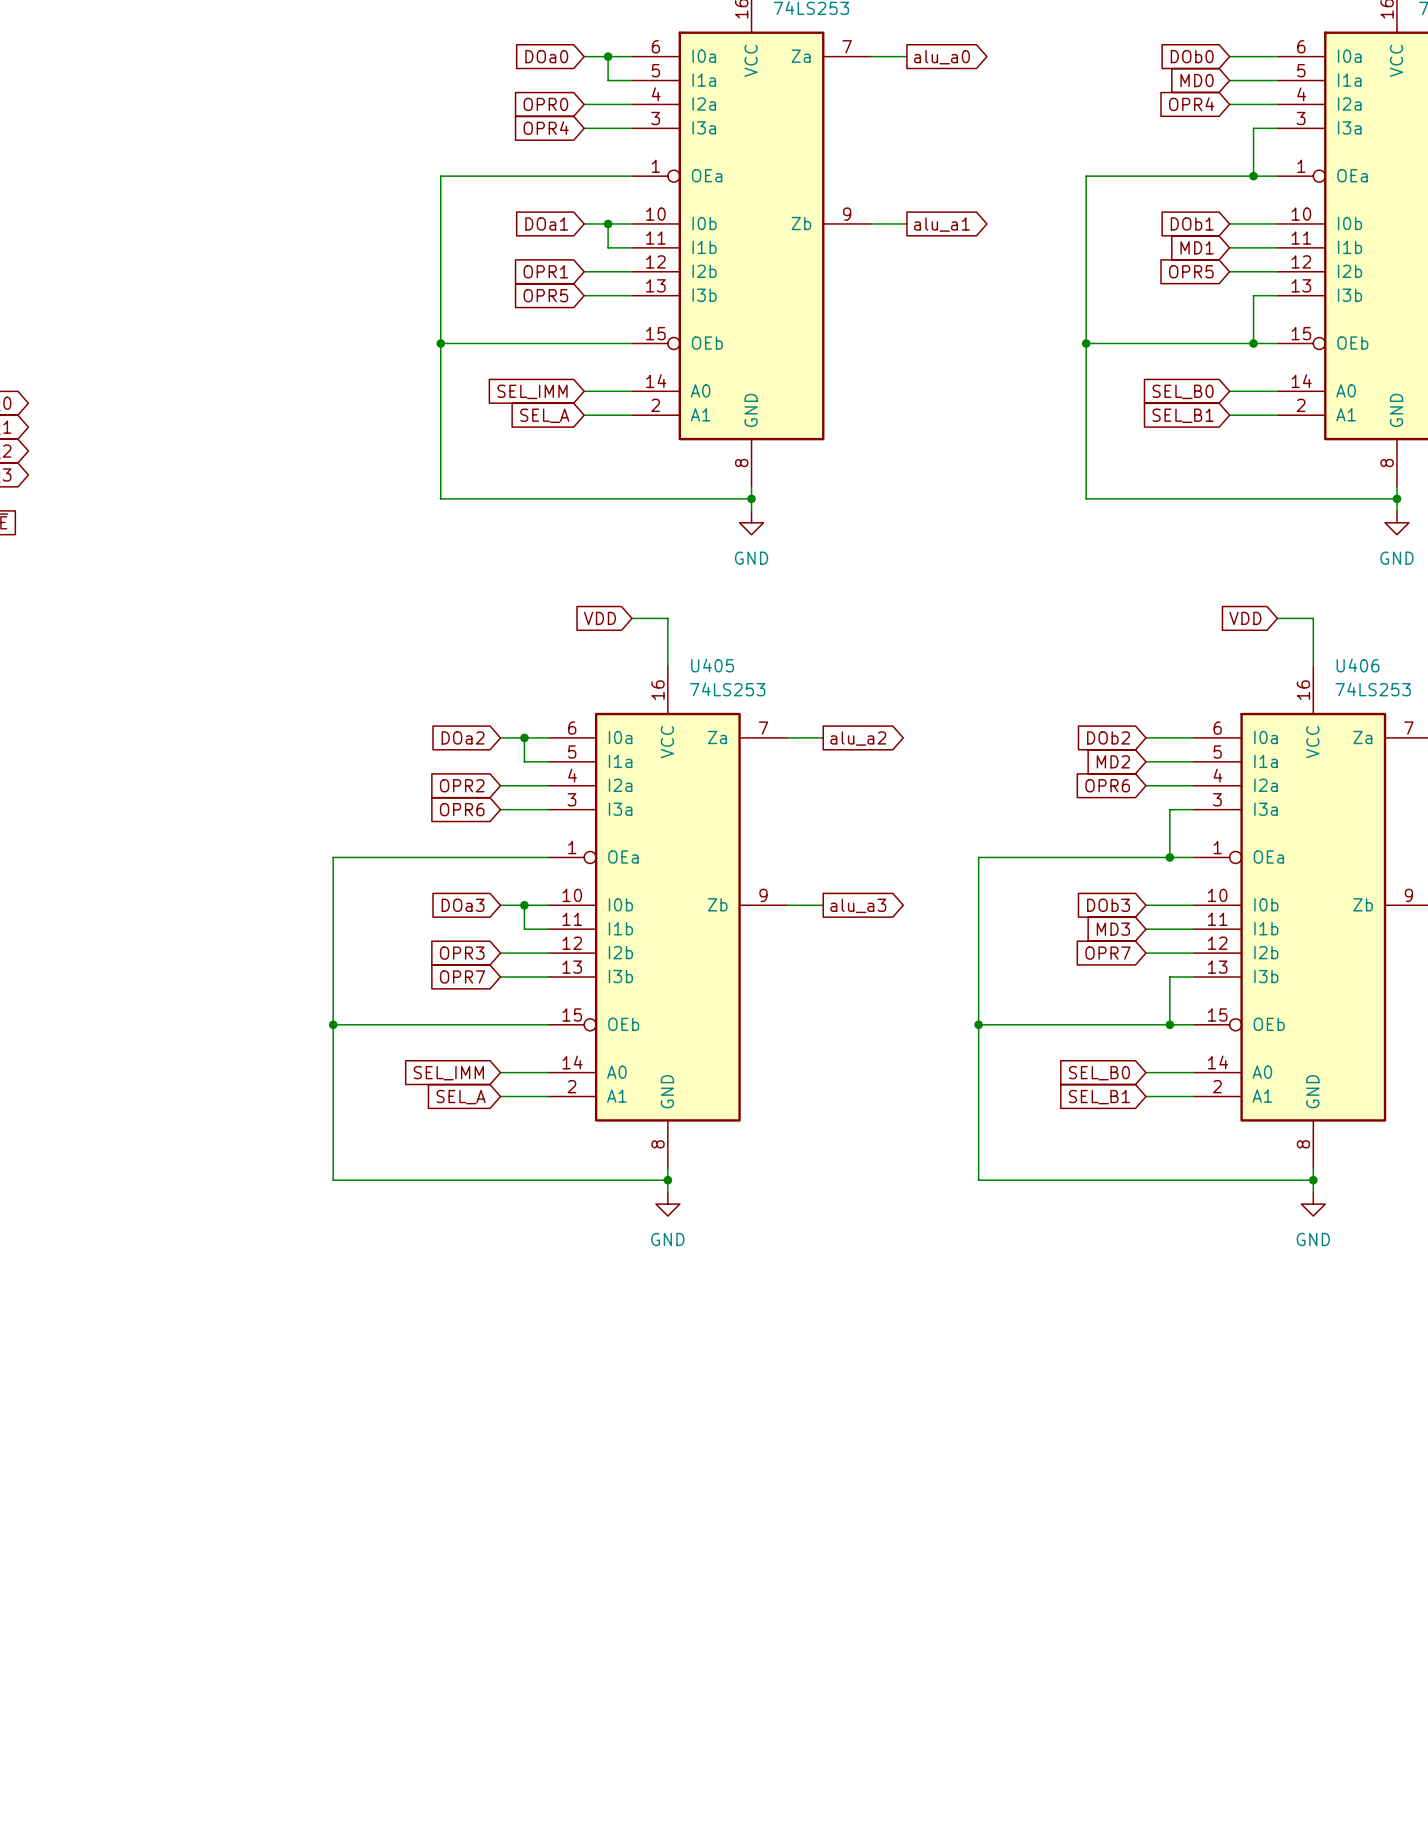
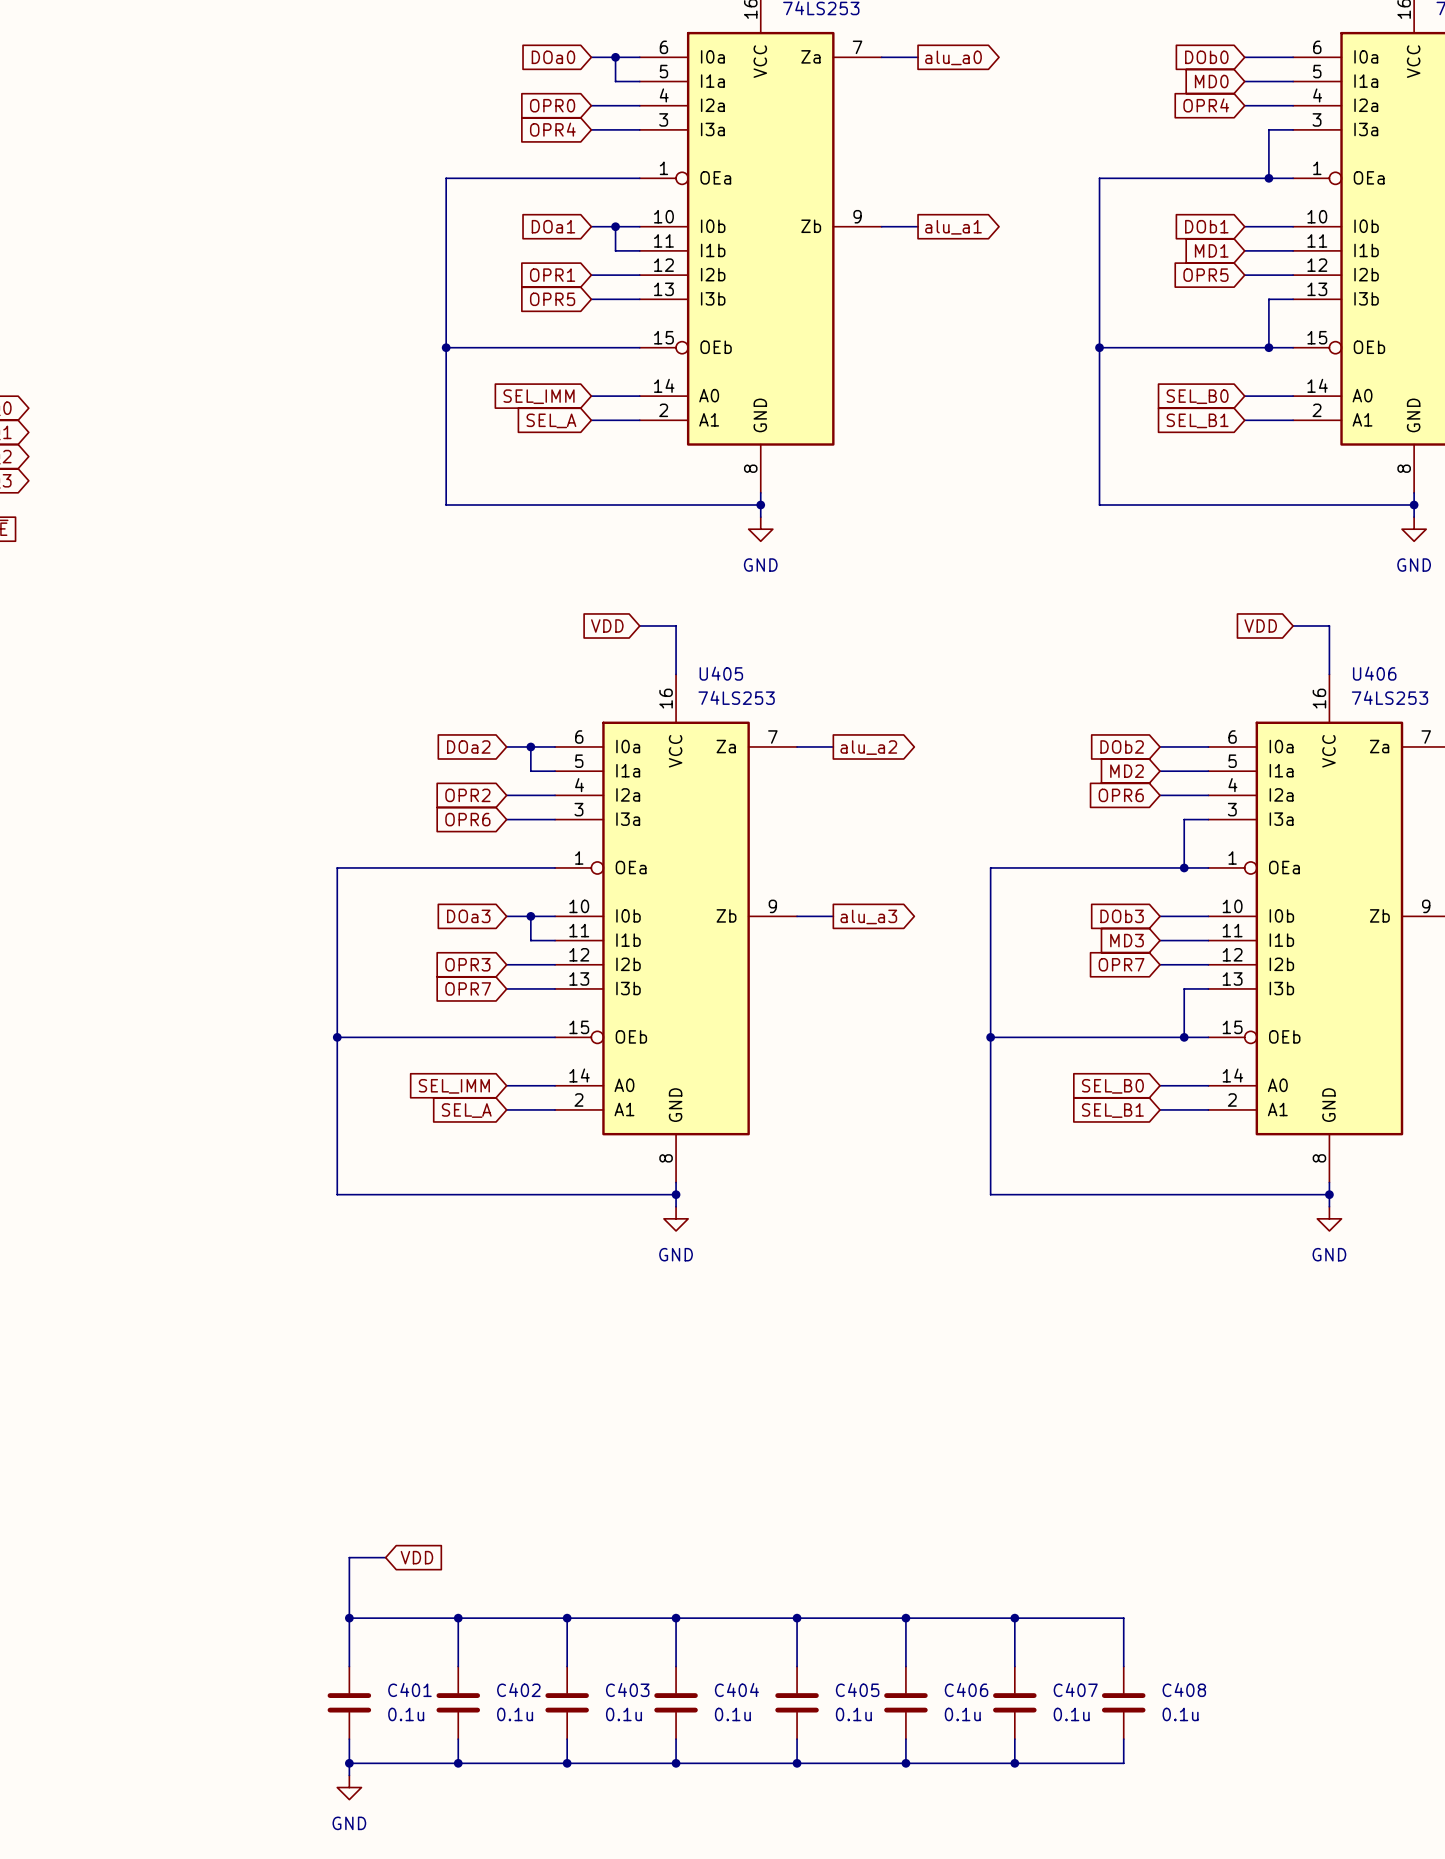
wire: none -> (385, 1557) (349, 1557) (349, 1666)
global label: none -> VDD (416, 1557)
wire: none -> (349, 1618) (1123, 1618) (1123, 1666)
junction: none -> (349, 1618)
wire: none -> (458, 1618) (458, 1666)
junction: none -> (458, 1618)
wire: none -> (567, 1618) (567, 1666)
junction: none -> (567, 1618)
wire: none -> (676, 1618) (676, 1666)
junction: none -> (676, 1618)
wire: none -> (797, 1618) (797, 1666)
junction: none -> (797, 1618)
wire: none -> (905, 1618) (905, 1666)
junction: none -> (905, 1618)
wire: none -> (1014, 1618) (1014, 1666)
junction: none -> (1014, 1618)
C401: none -> 0.1u (349, 1702)
C402: none -> 0.1u (458, 1702)
C403: none -> 0.1u (567, 1702)
C404: none -> 0.1u (676, 1702)
C405: none -> 0.1u (797, 1702)
C406: none -> 0.1u (905, 1702)
C407: none -> 0.1u (1014, 1702)
C408: none -> 0.1u (1123, 1702)
wire: none -> (349, 1739) (349, 1775)
wire: none -> (458, 1739) (458, 1763)
wire: none -> (567, 1739) (567, 1763)
wire: none -> (676, 1739) (676, 1763)
wire: none -> (797, 1739) (797, 1763)
wire: none -> (905, 1739) (905, 1763)
wire: none -> (1014, 1739) (1014, 1763)
wire: none -> (1123, 1739) (1123, 1763) (349, 1763)
junction: none -> (349, 1763)
junction: none -> (458, 1763)
junction: none -> (567, 1763)
junction: none -> (676, 1763)
junction: none -> (797, 1763)
junction: none -> (905, 1763)
junction: none -> (1014, 1763)
power symbol: none -> GND (349, 1787)

